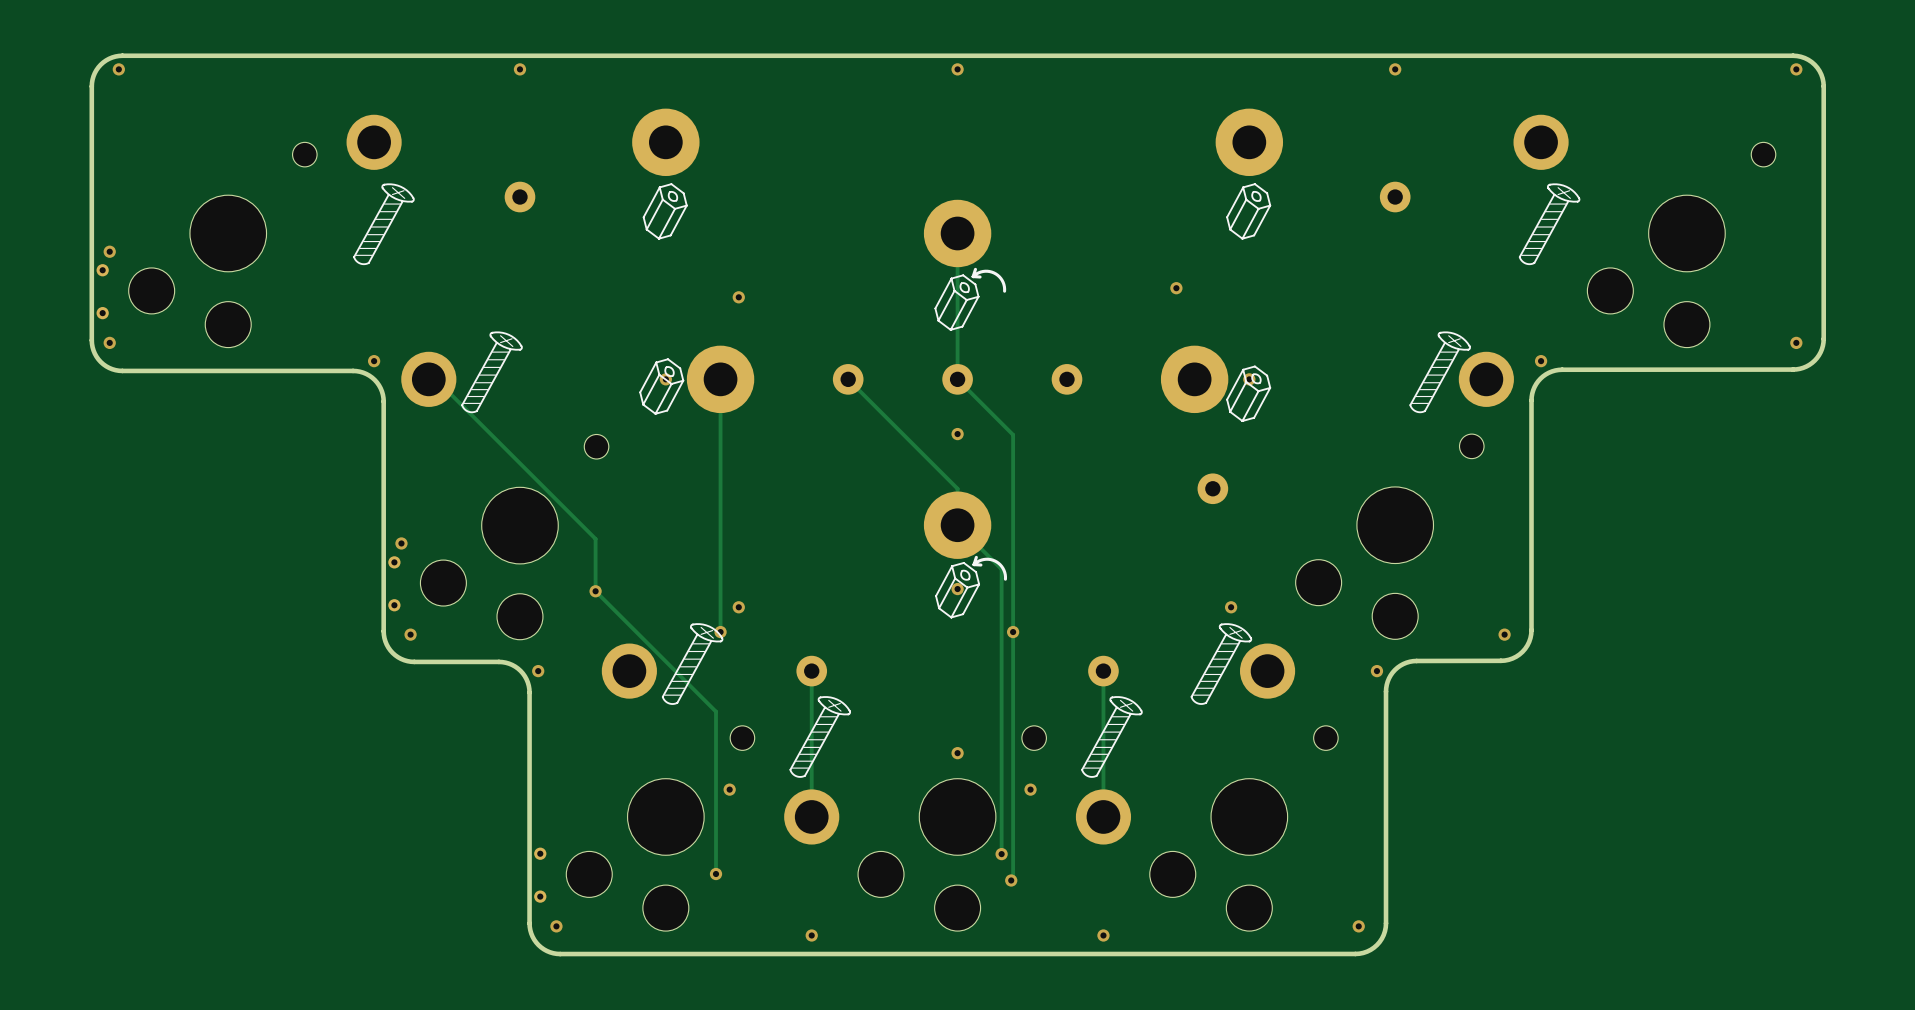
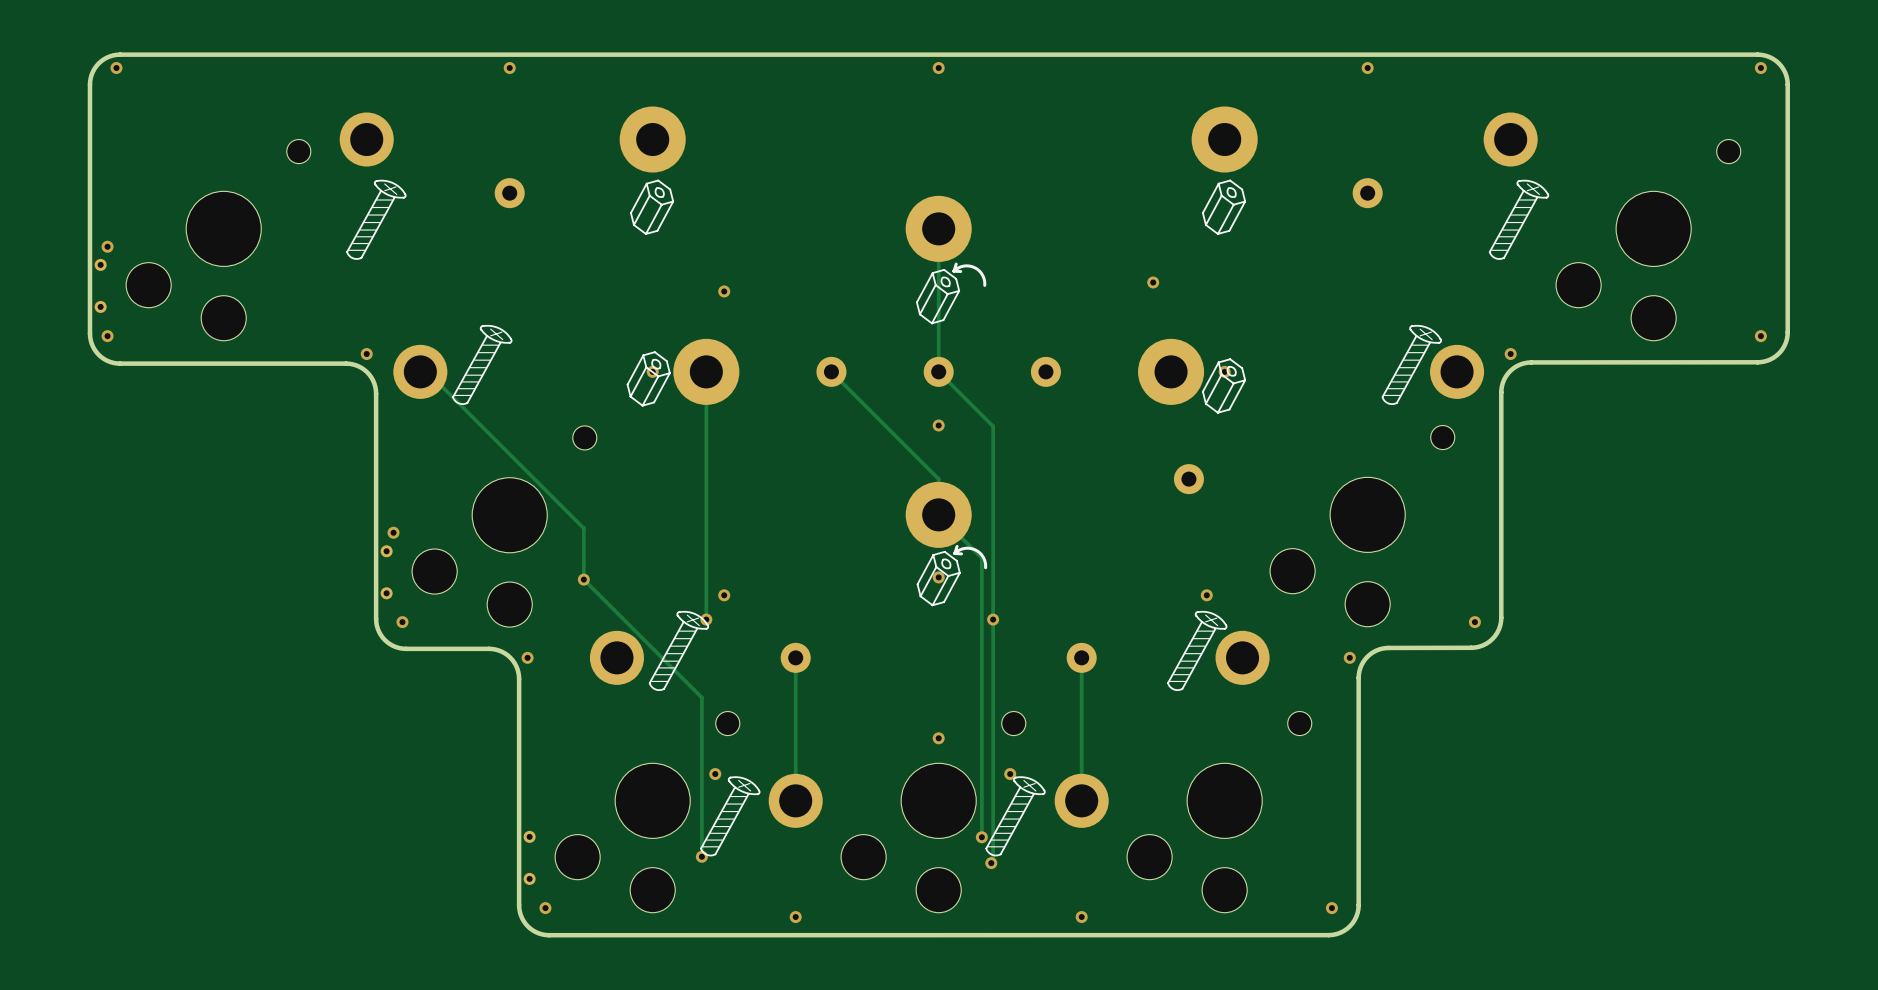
drawing: [789, 696, 852, 778] -> none
drawing: [1081, 696, 1143, 778] -> none
drawing: none -> [700, 776, 761, 857]
drawing: none -> [985, 776, 1046, 857]

